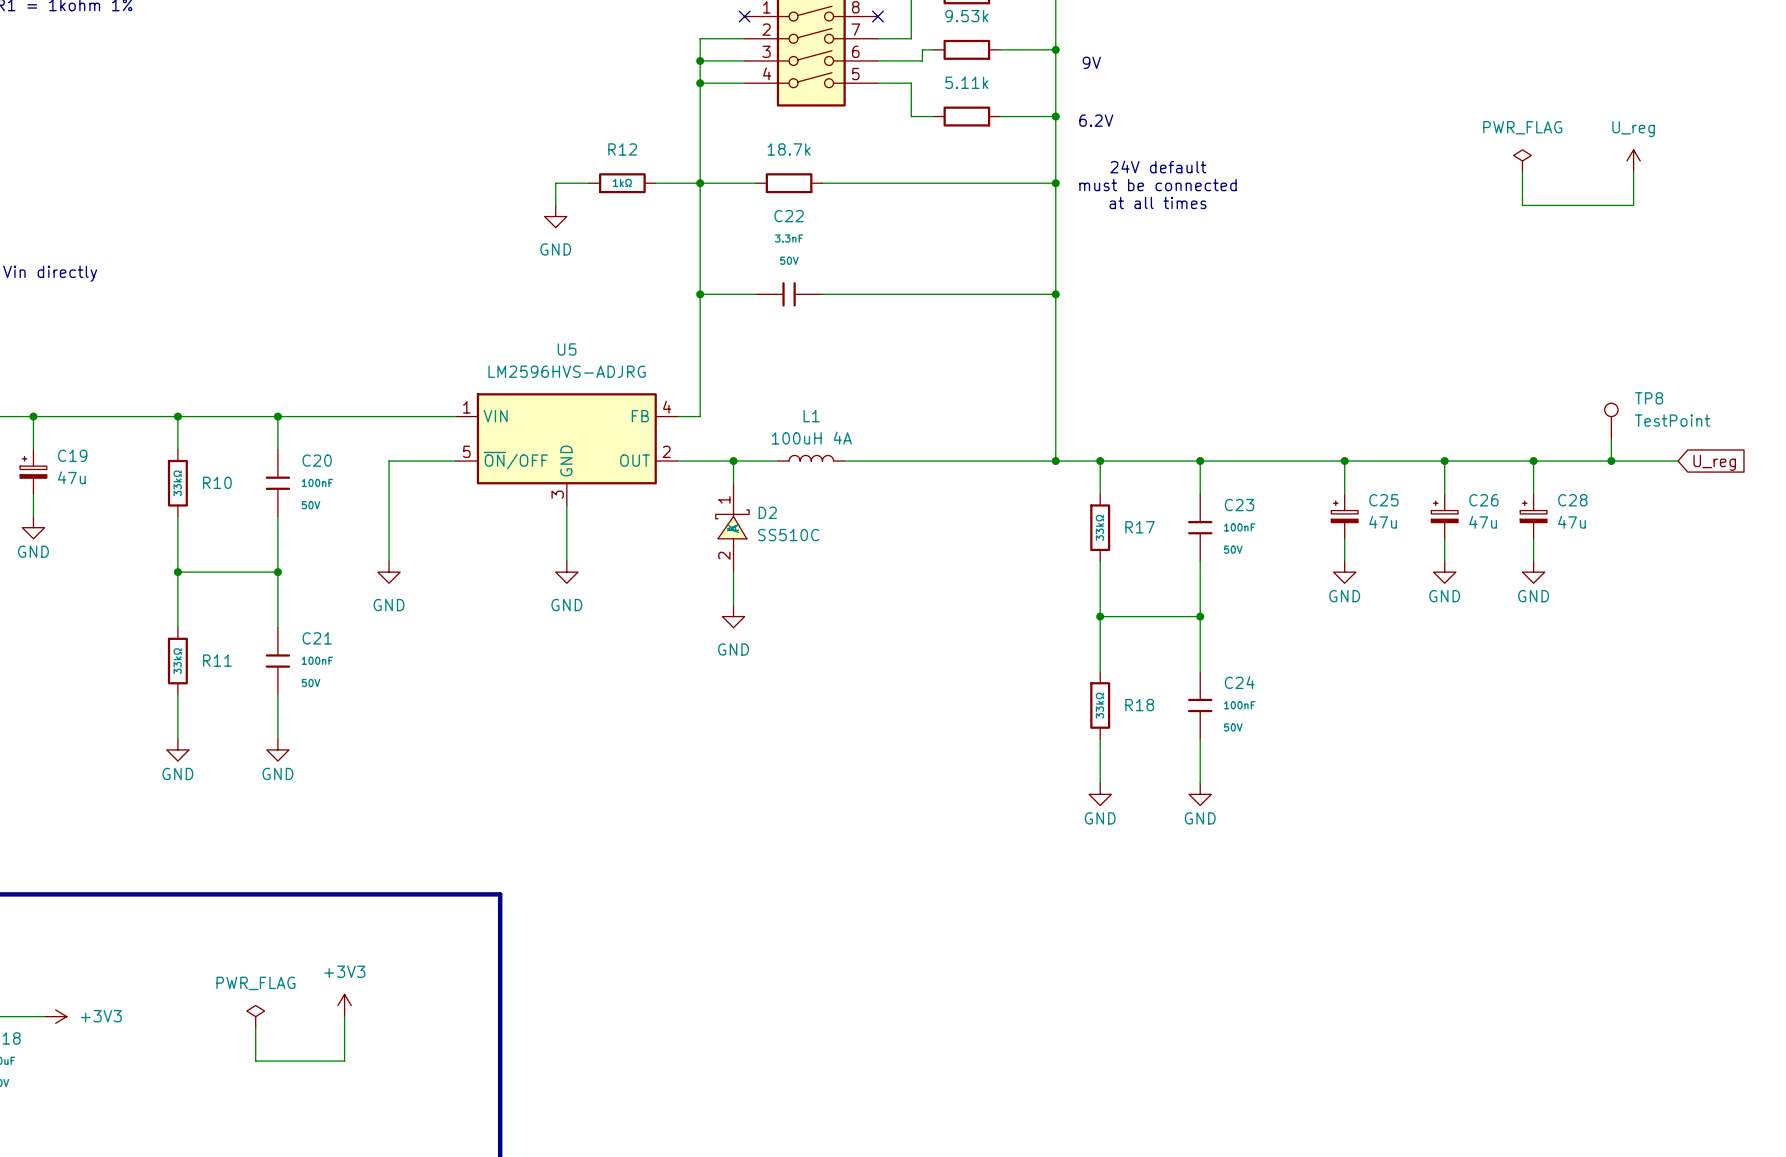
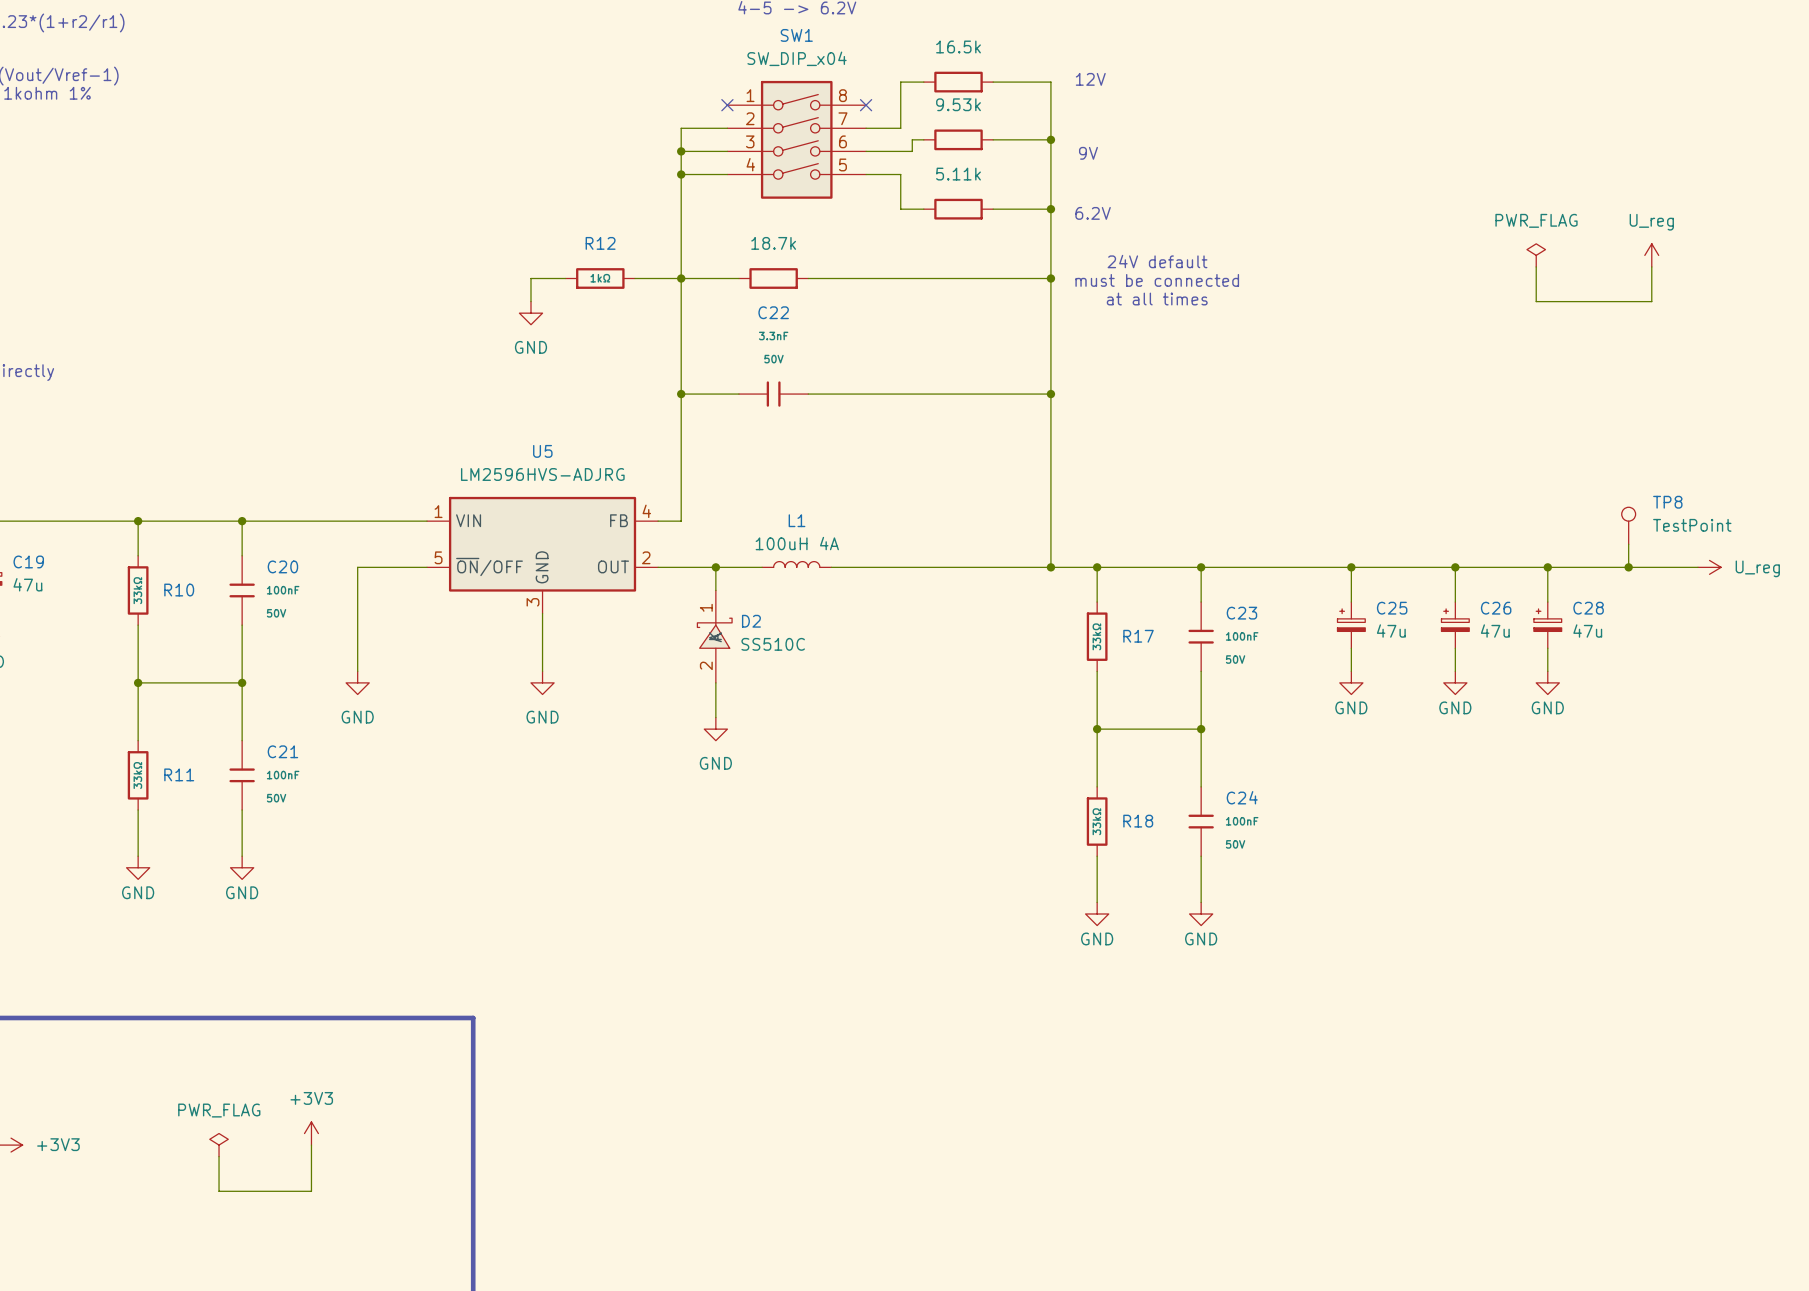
power symbol: none -> U_reg (1709, 567)
global label: U_reg (1714, 462) -> none

